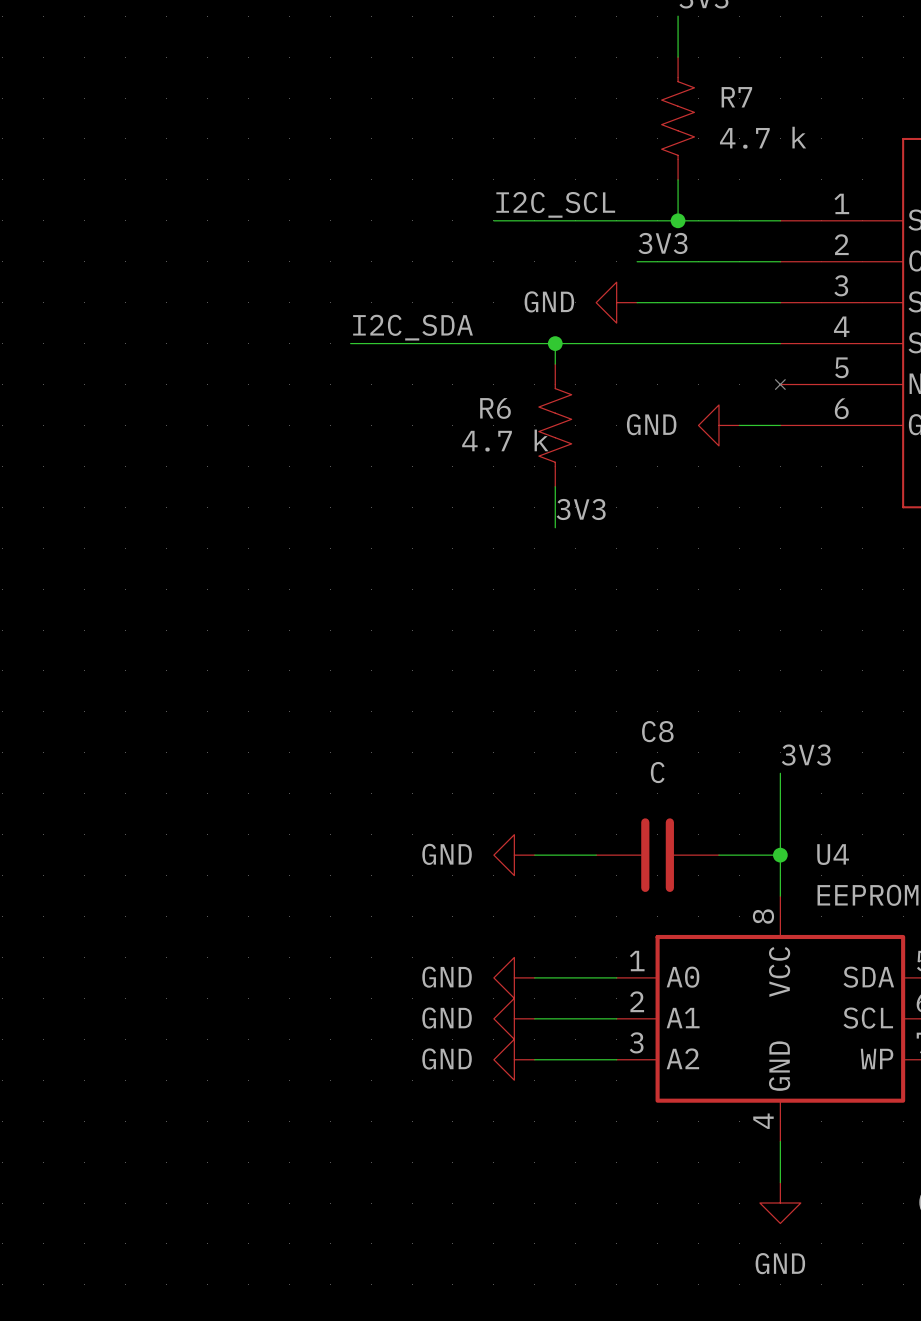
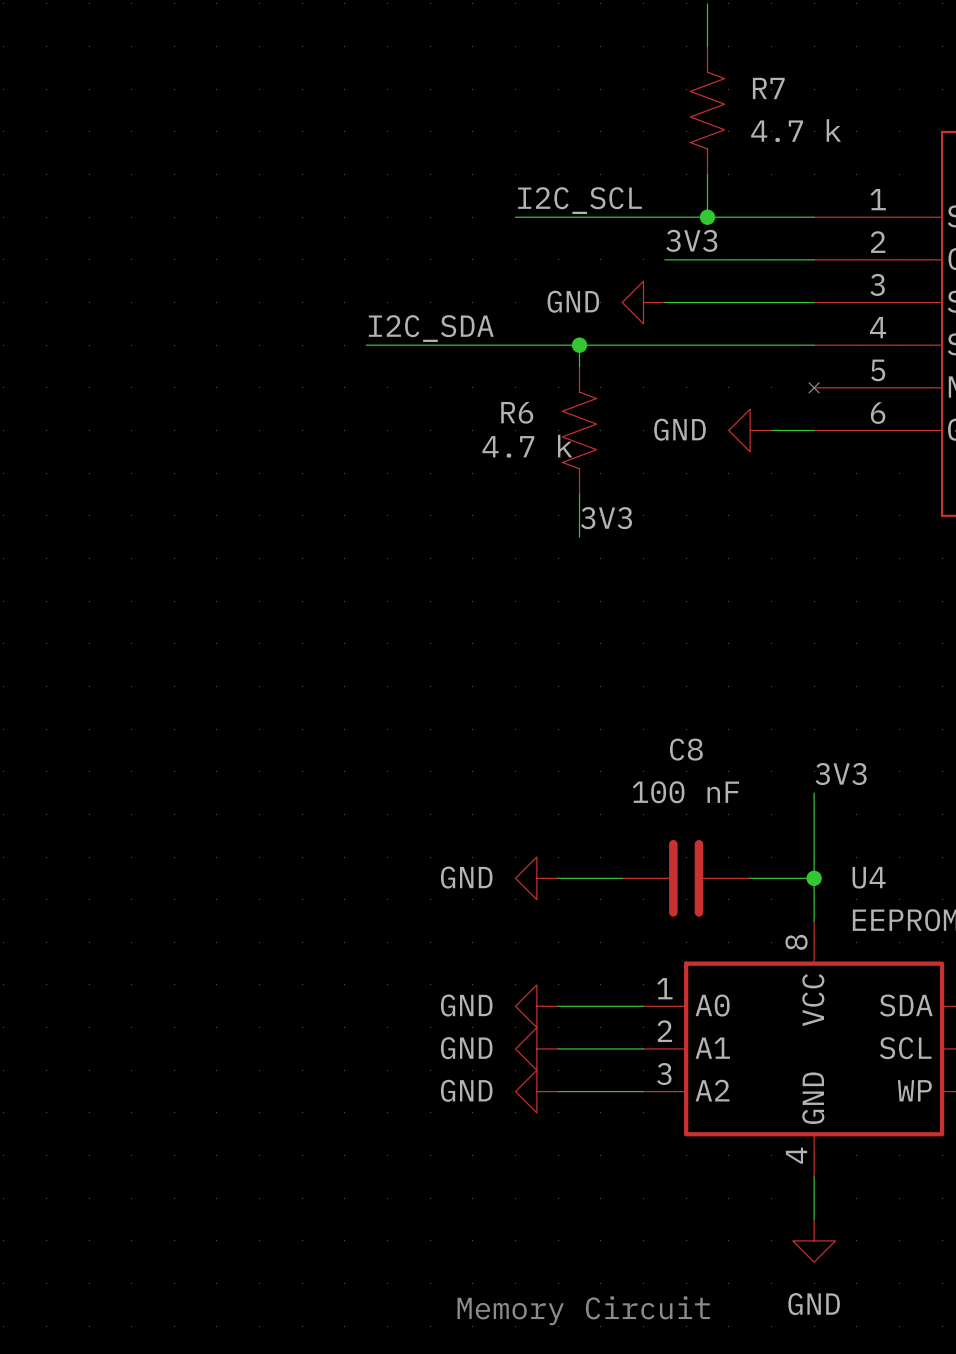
C8 value: C (657, 772) -> 100 nF (685, 792)
text: none -> Memory Circuit (583, 1310)

